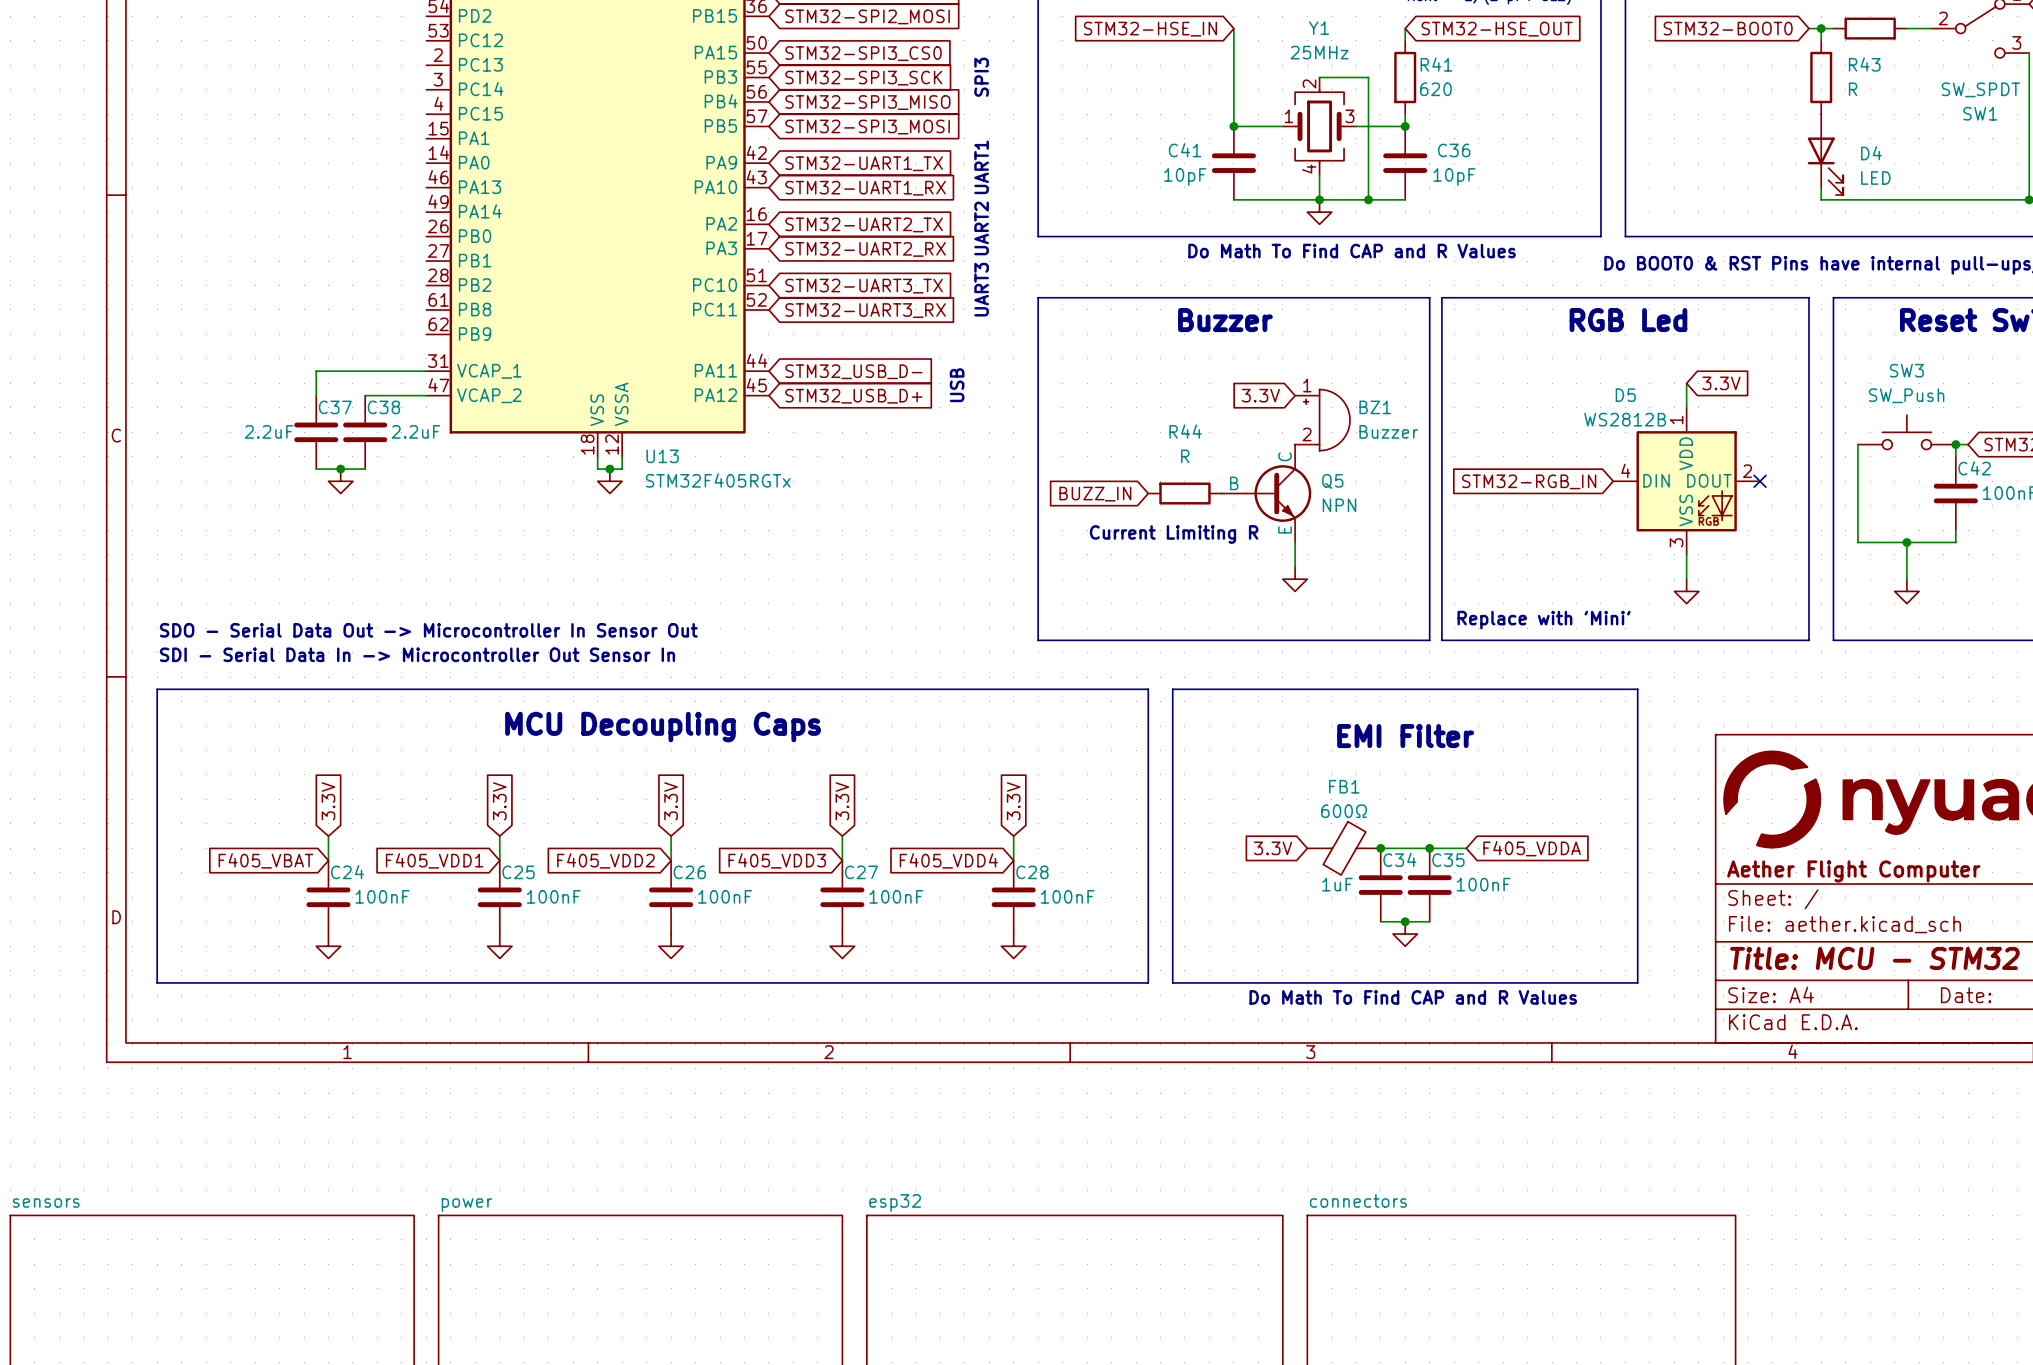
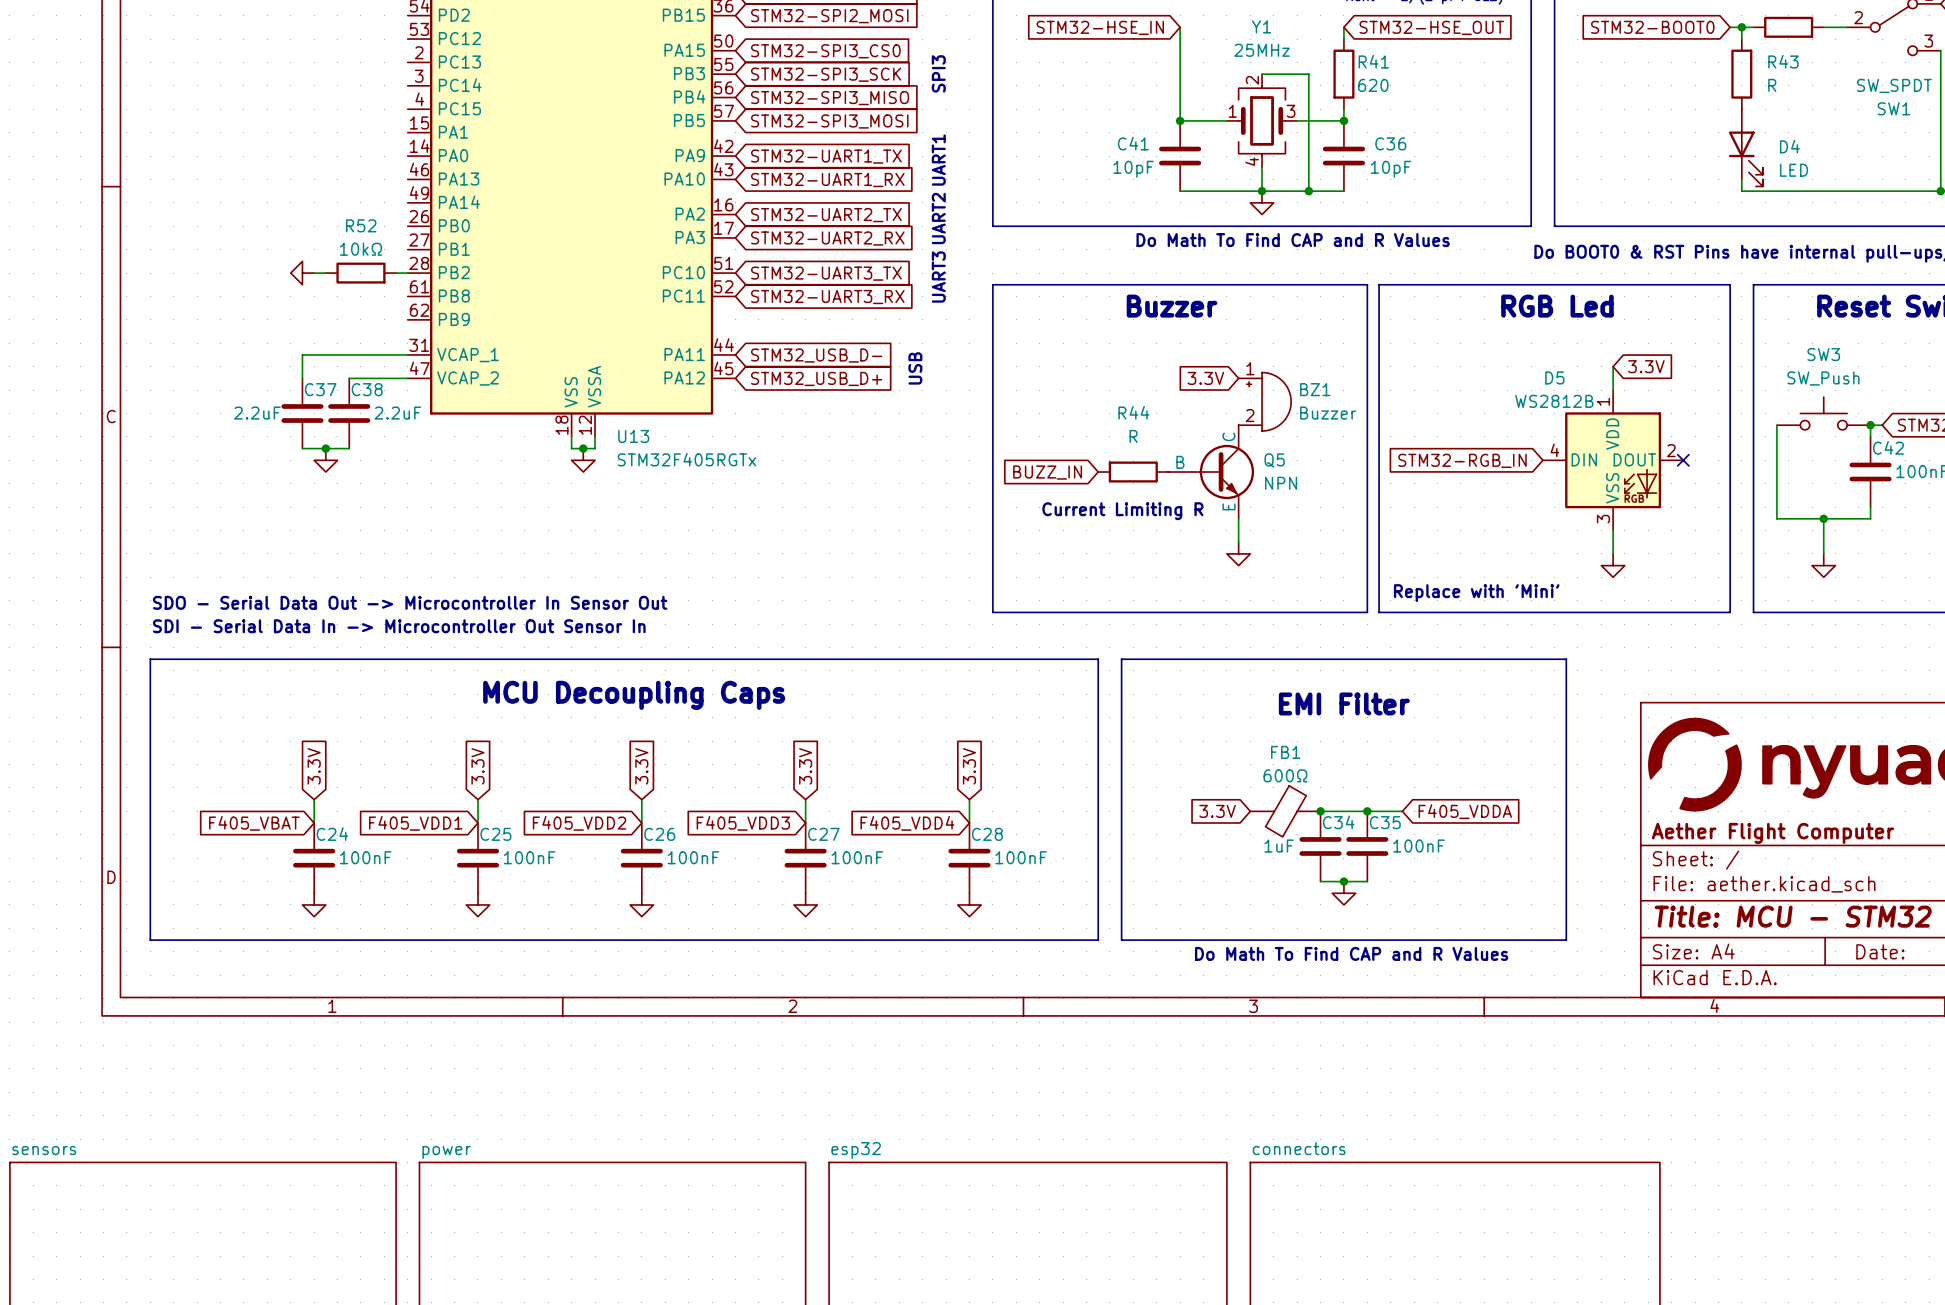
power symbol: none -> (302, 273)
wire: none -> (314, 273) (325, 273)
R52: none -> 10kΩ (360, 273)
wire: none -> (396, 273) (407, 273)

